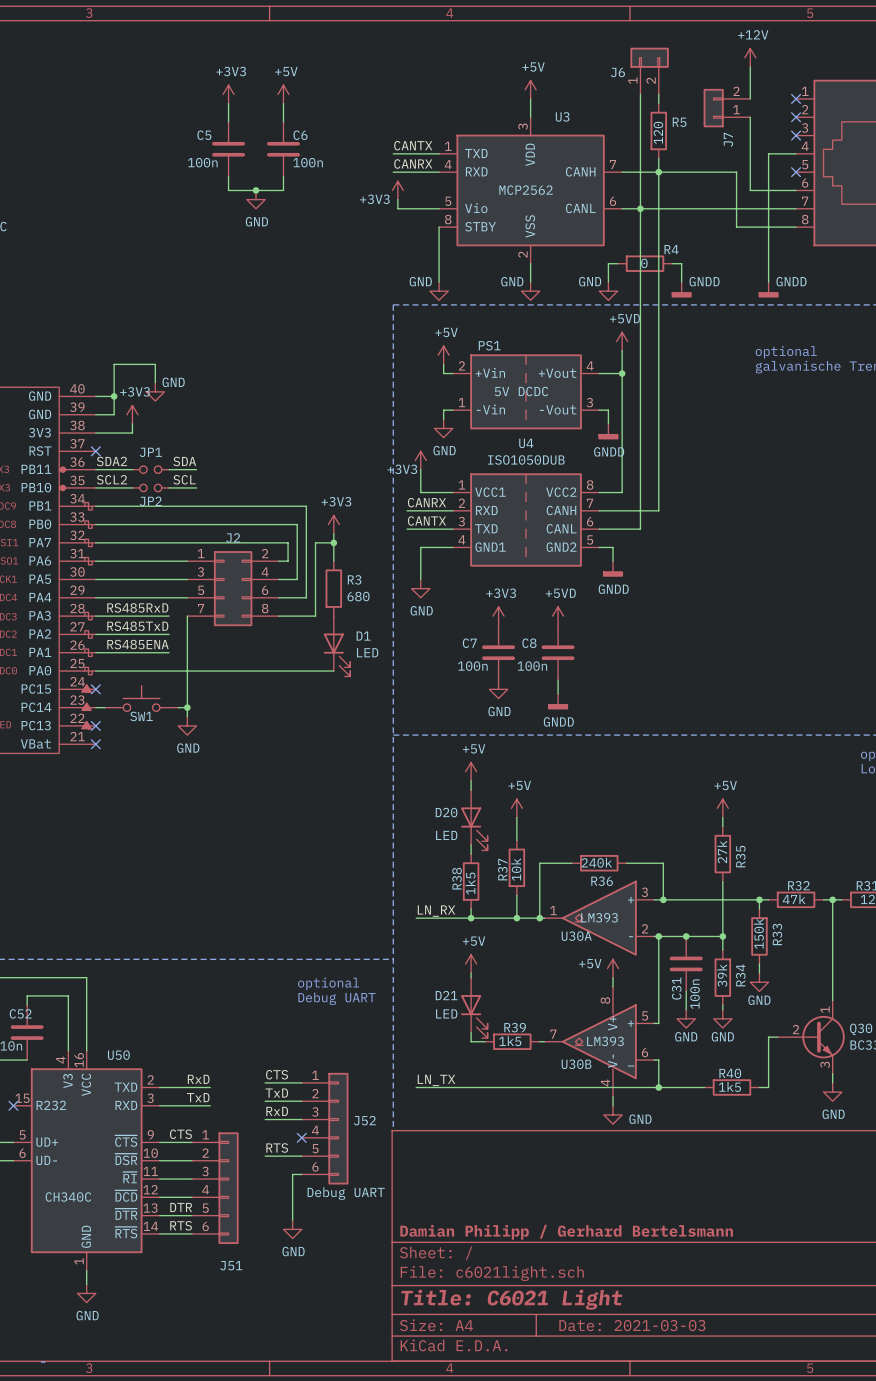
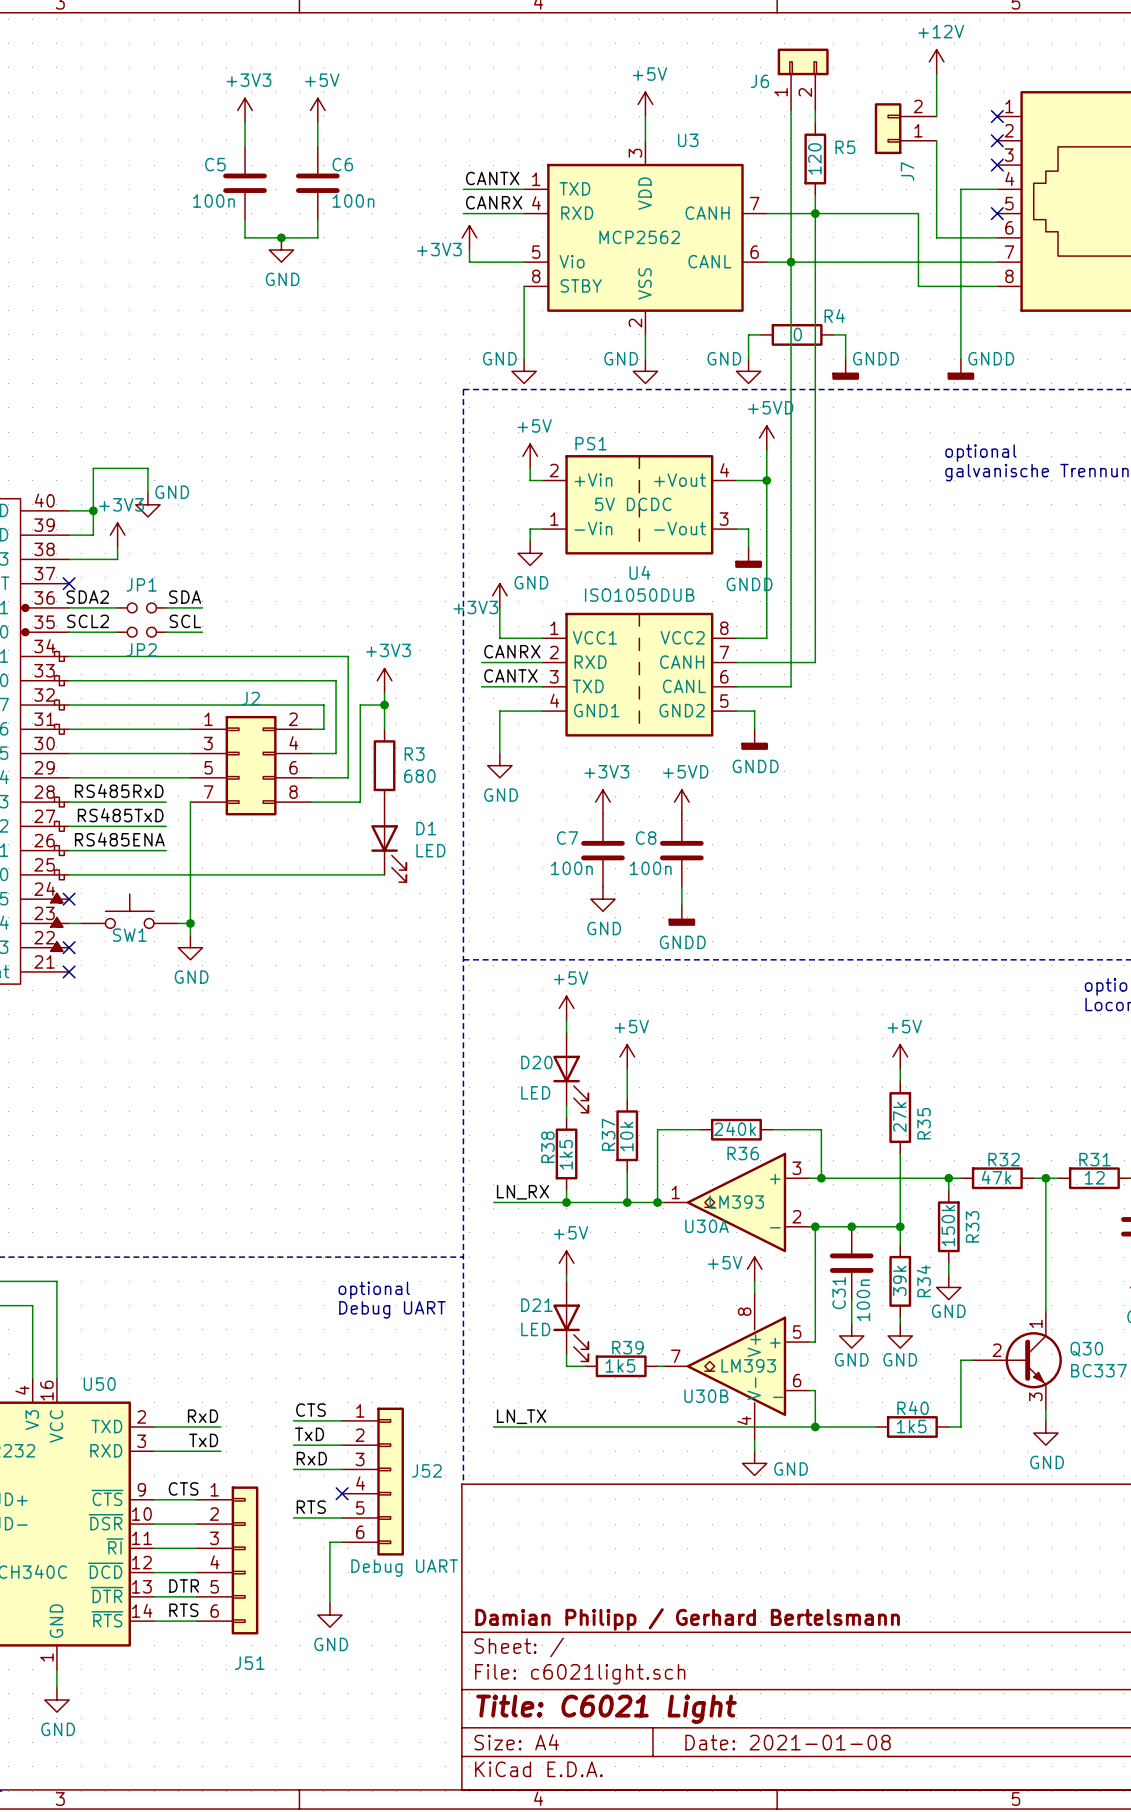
title block: Date: 2021-03-03 (632, 1325) -> Date: 2021-01-08 (788, 1742)

